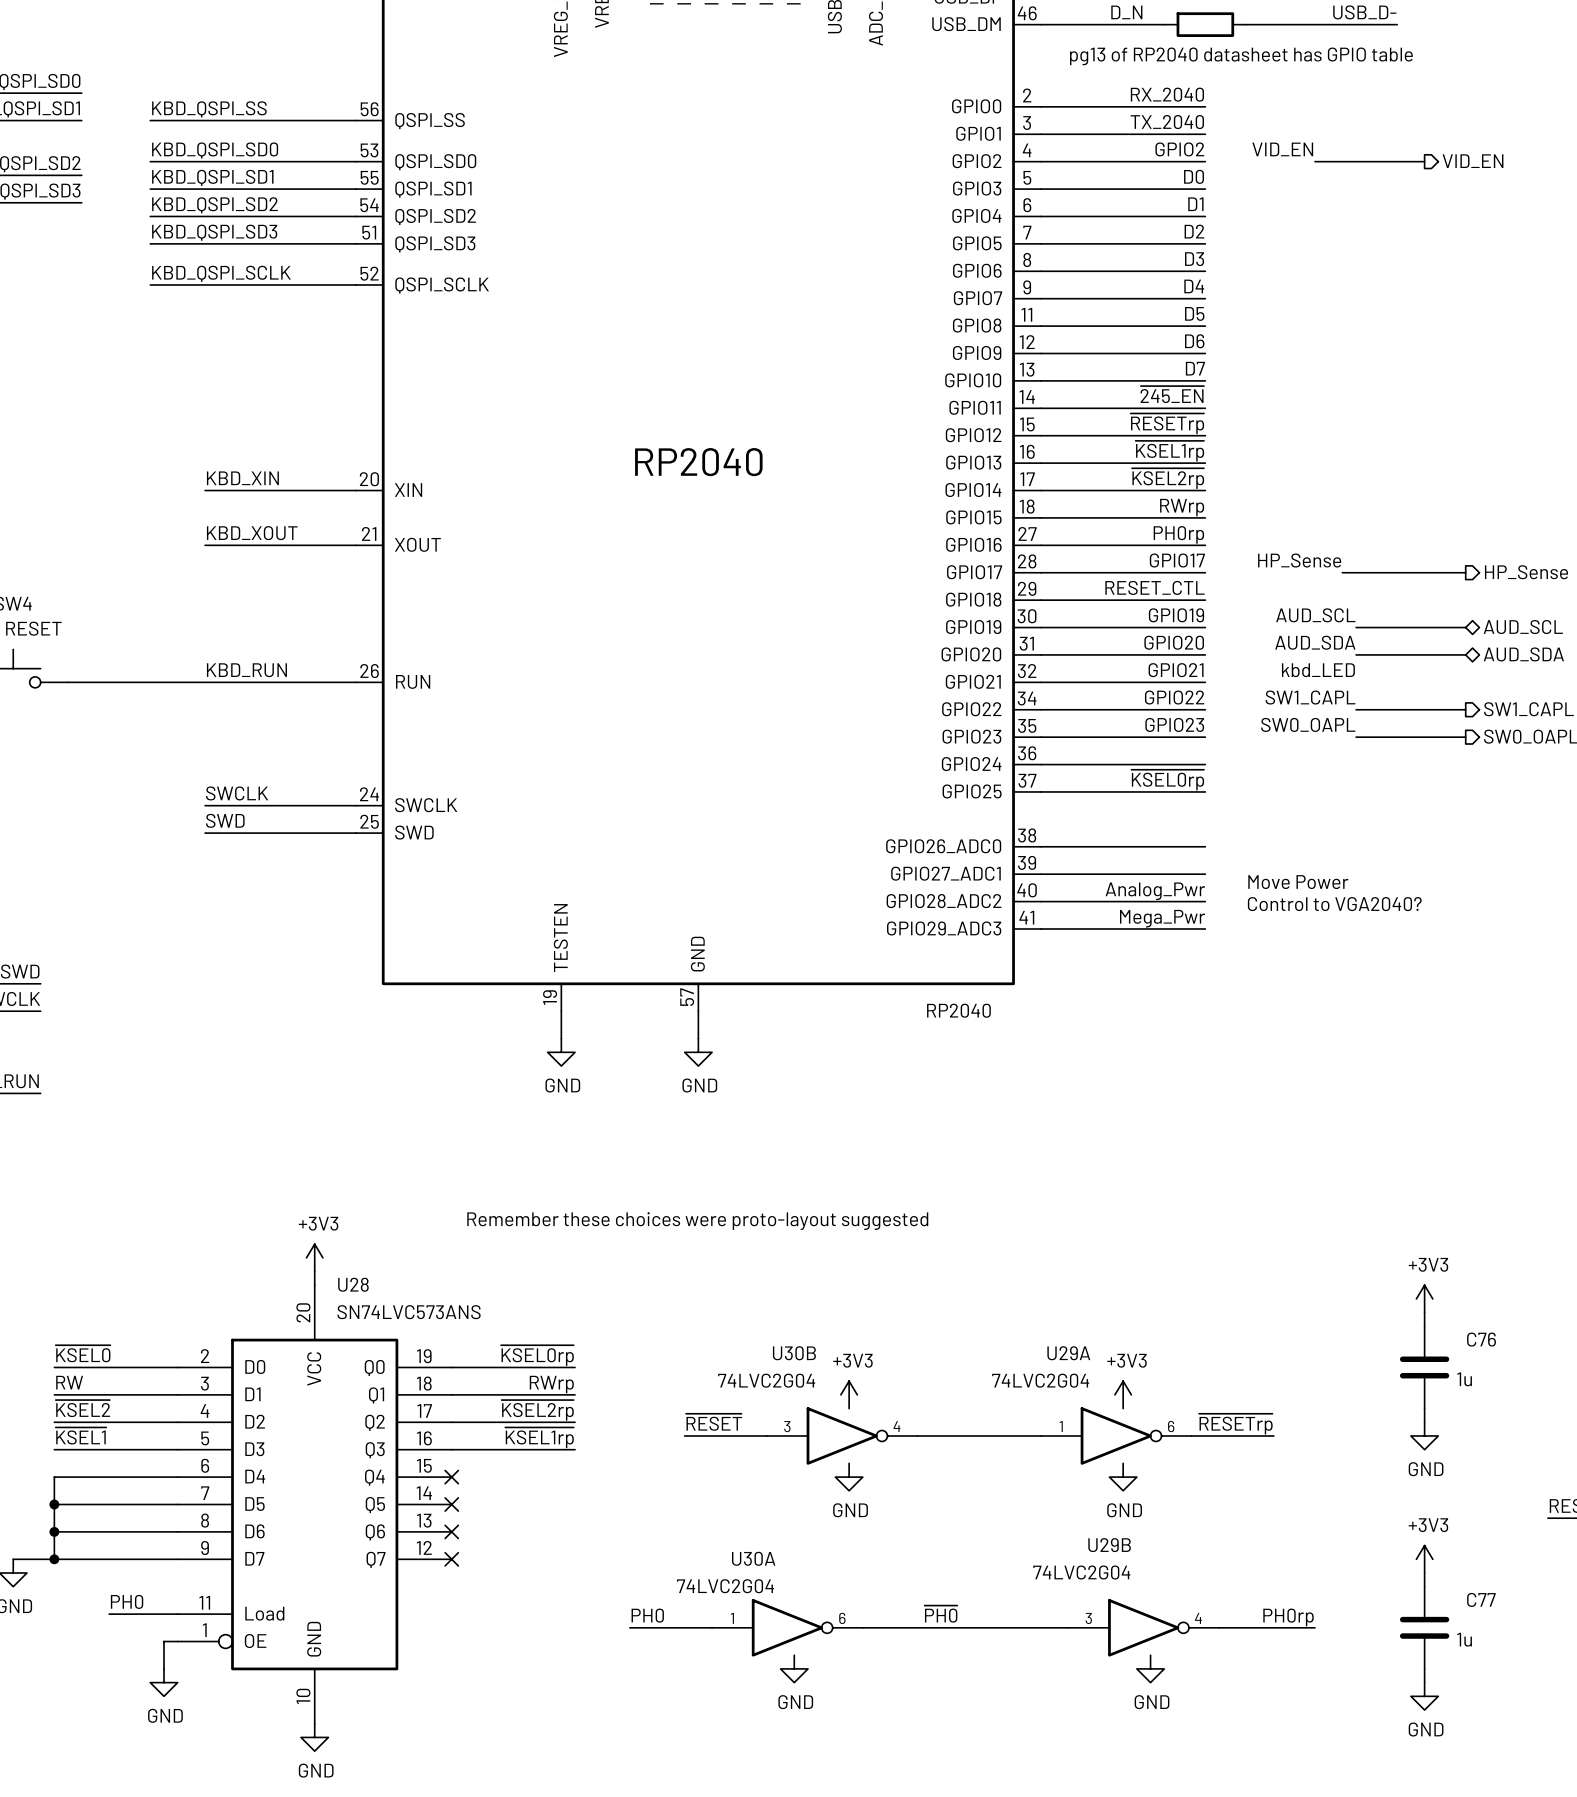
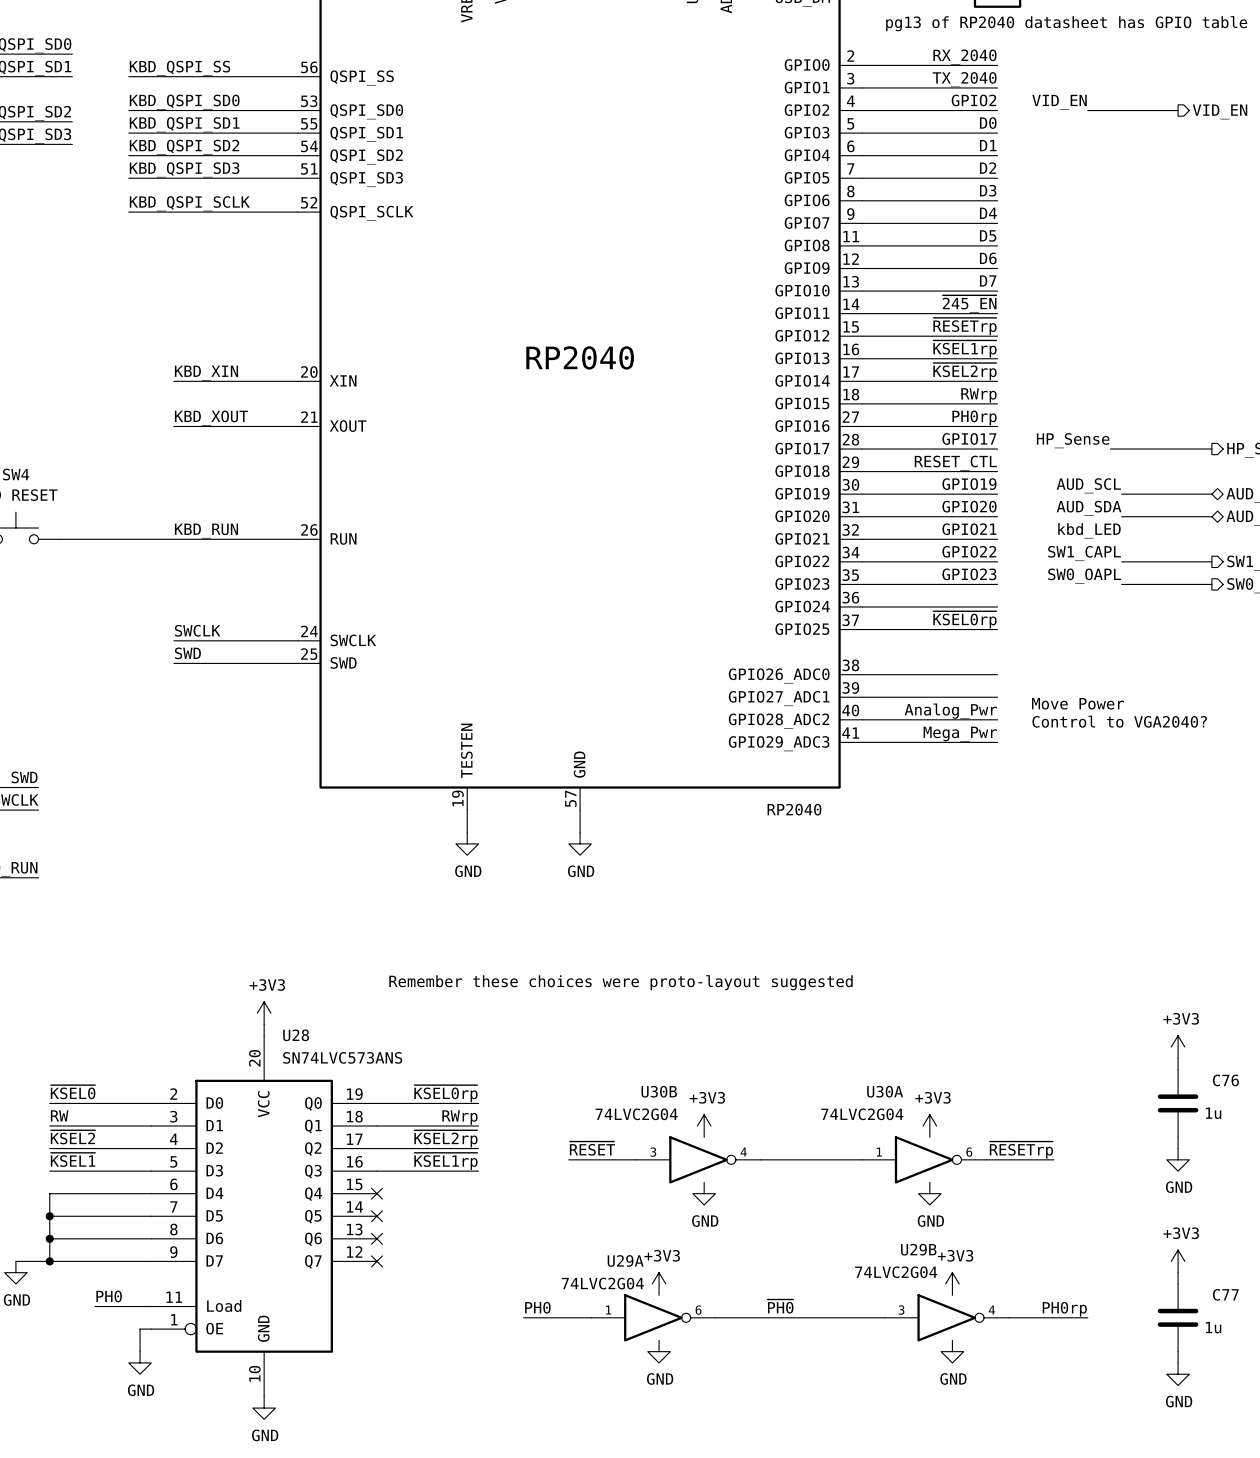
U29A name: U29A (1068, 1353) -> U30A (885, 1091)
U30A name: U30A (753, 1558) -> U29A (625, 1260)
power symbol: none -> +3V3 (659, 1283)
power symbol: none -> +3V3 (952, 1283)

